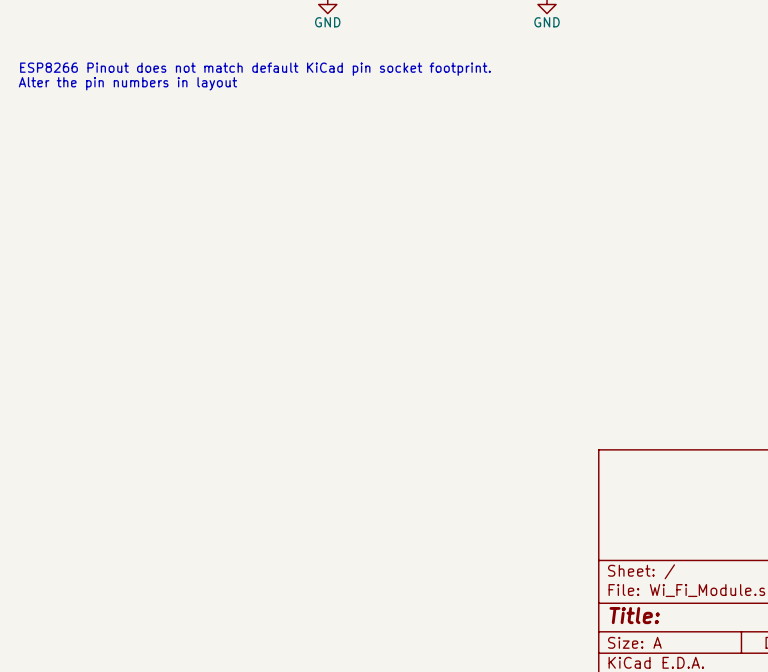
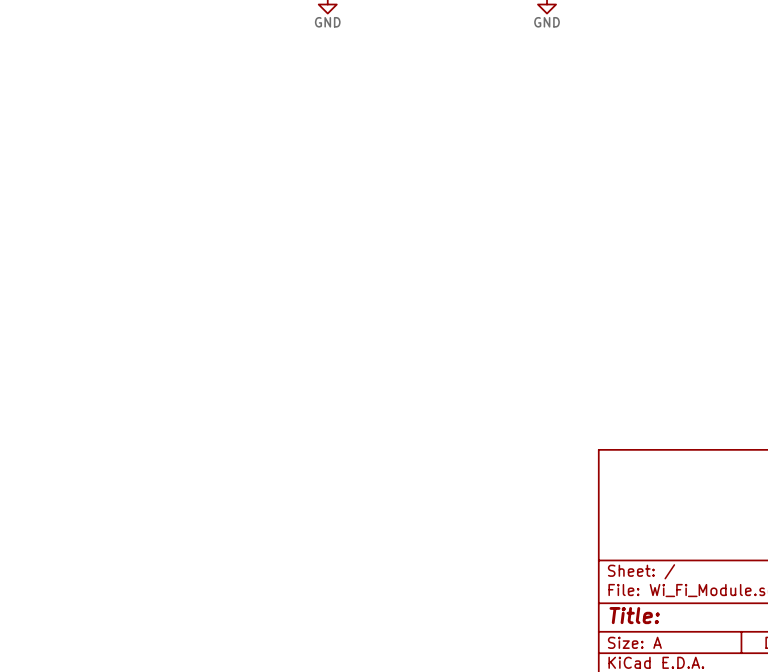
text: ESP8266 Pinout does not match default KiCad pin socket footprint. (255, 69) -> none
text: Alter the pin numbers in layout (127, 83) -> none

